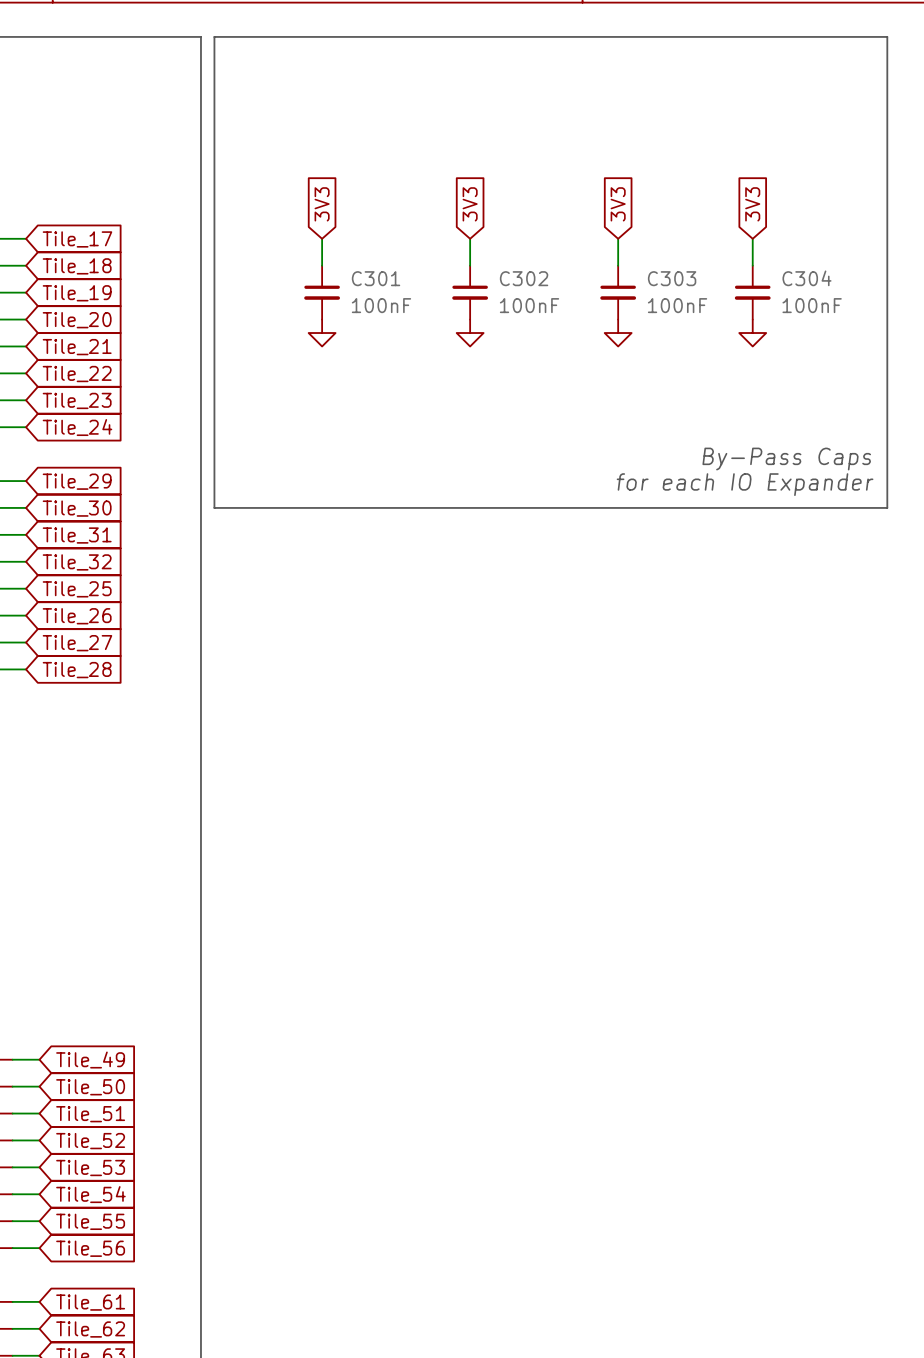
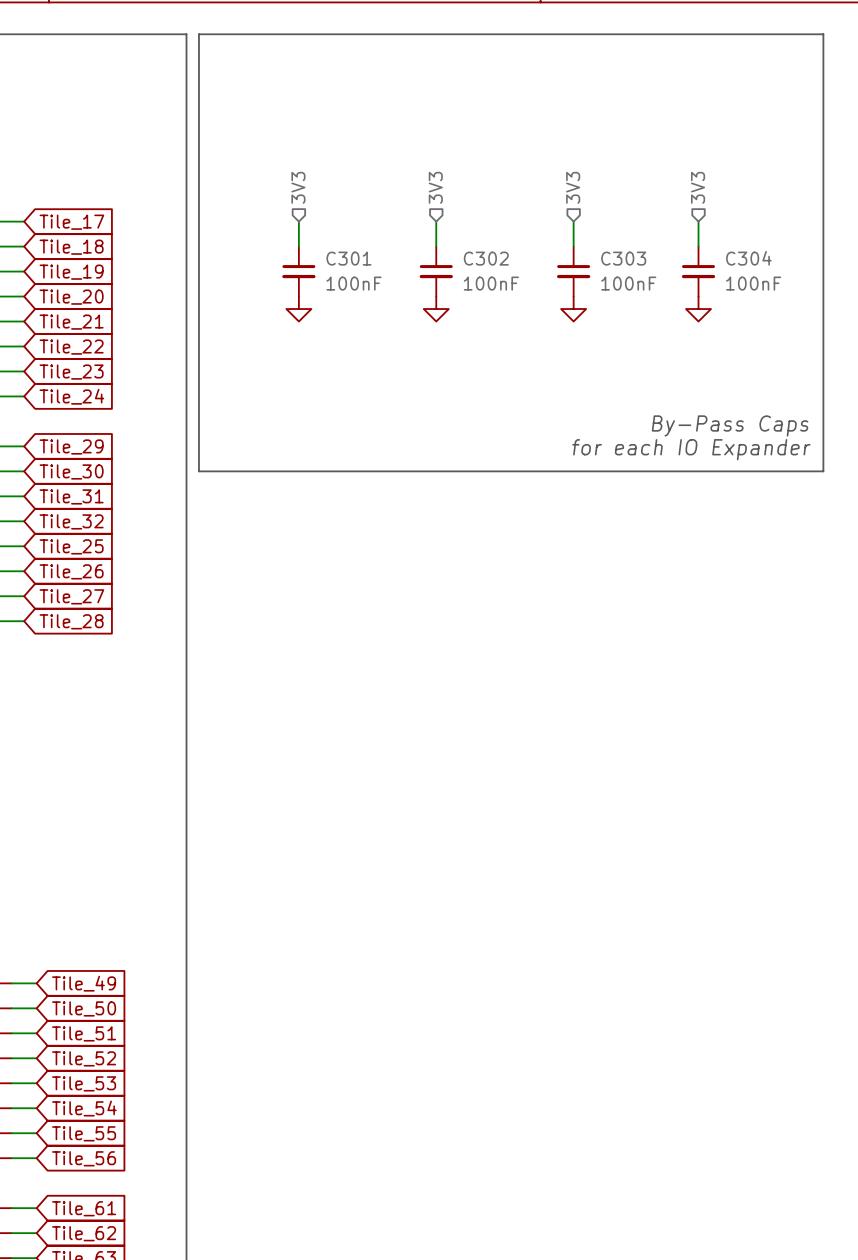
hierarchical label: none -> 3V3 (298, 187)
hierarchical label: none -> 3V3 (435, 187)
hierarchical label: none -> 3V3 (573, 187)
hierarchical label: none -> 3V3 (698, 187)
global label: 3V3 (322, 204) -> none
global label: 3V3 (470, 204) -> none
global label: 3V3 (618, 204) -> none
global label: 3V3 (752, 204) -> none

